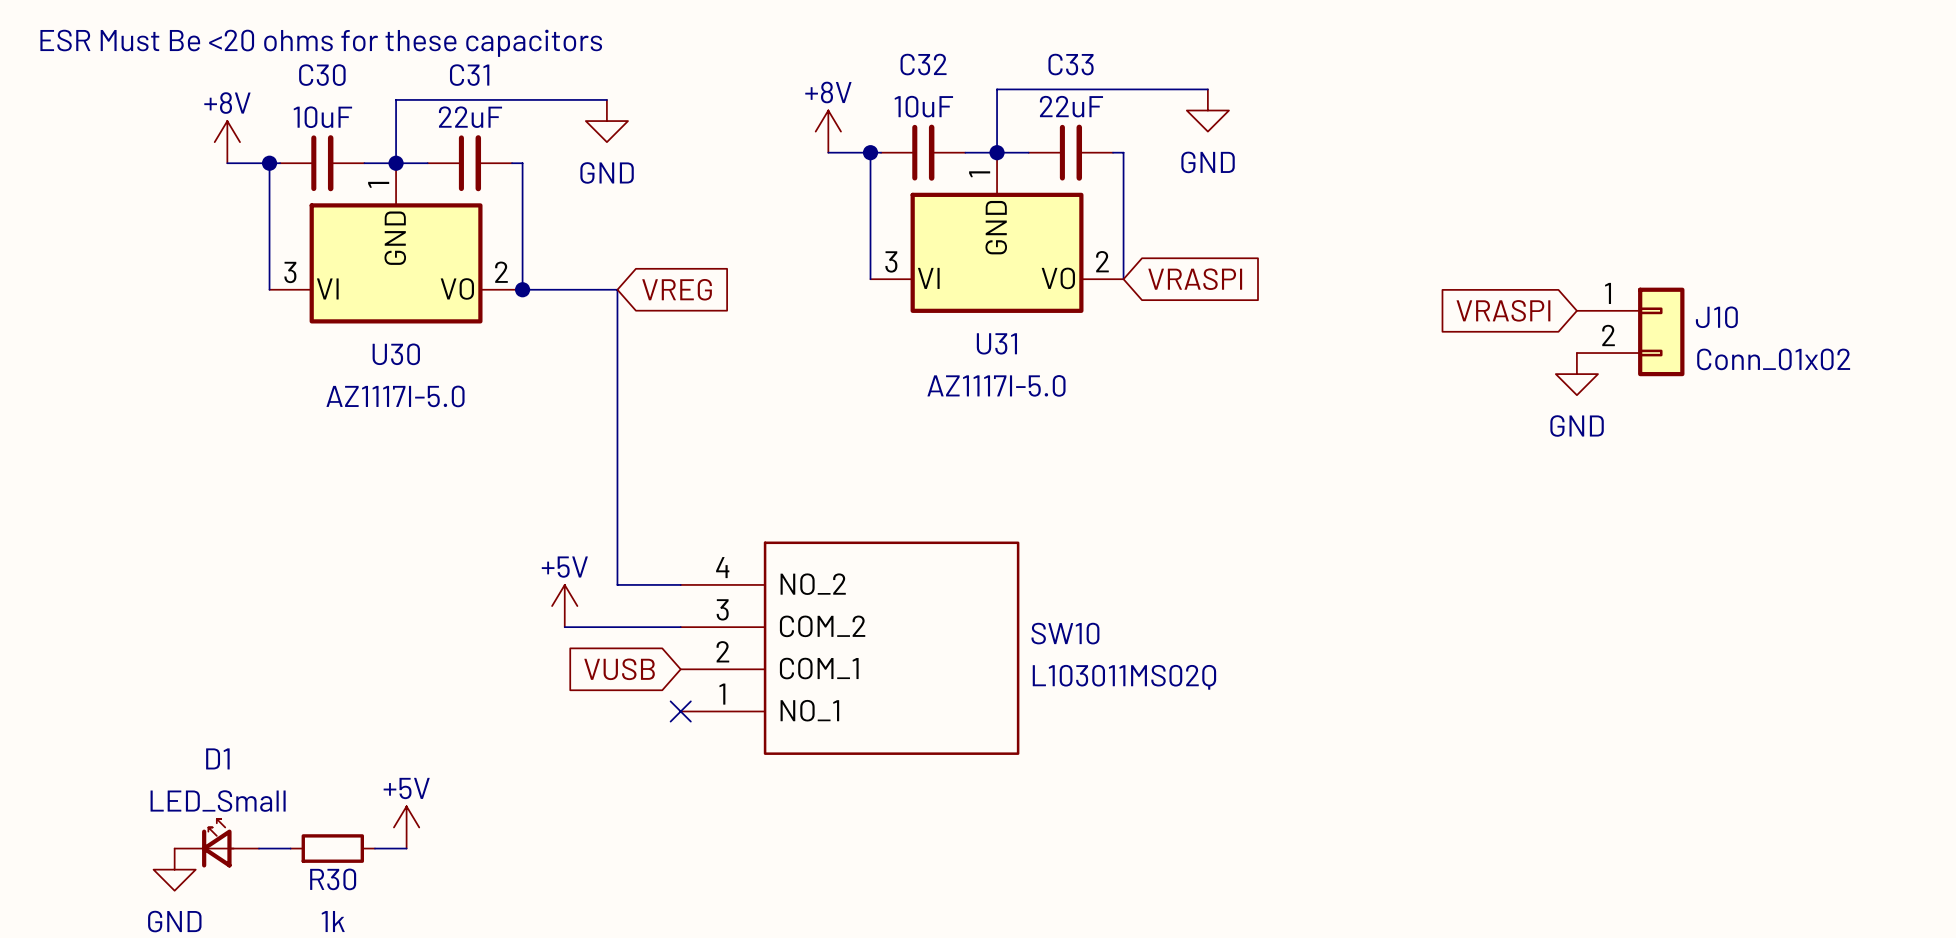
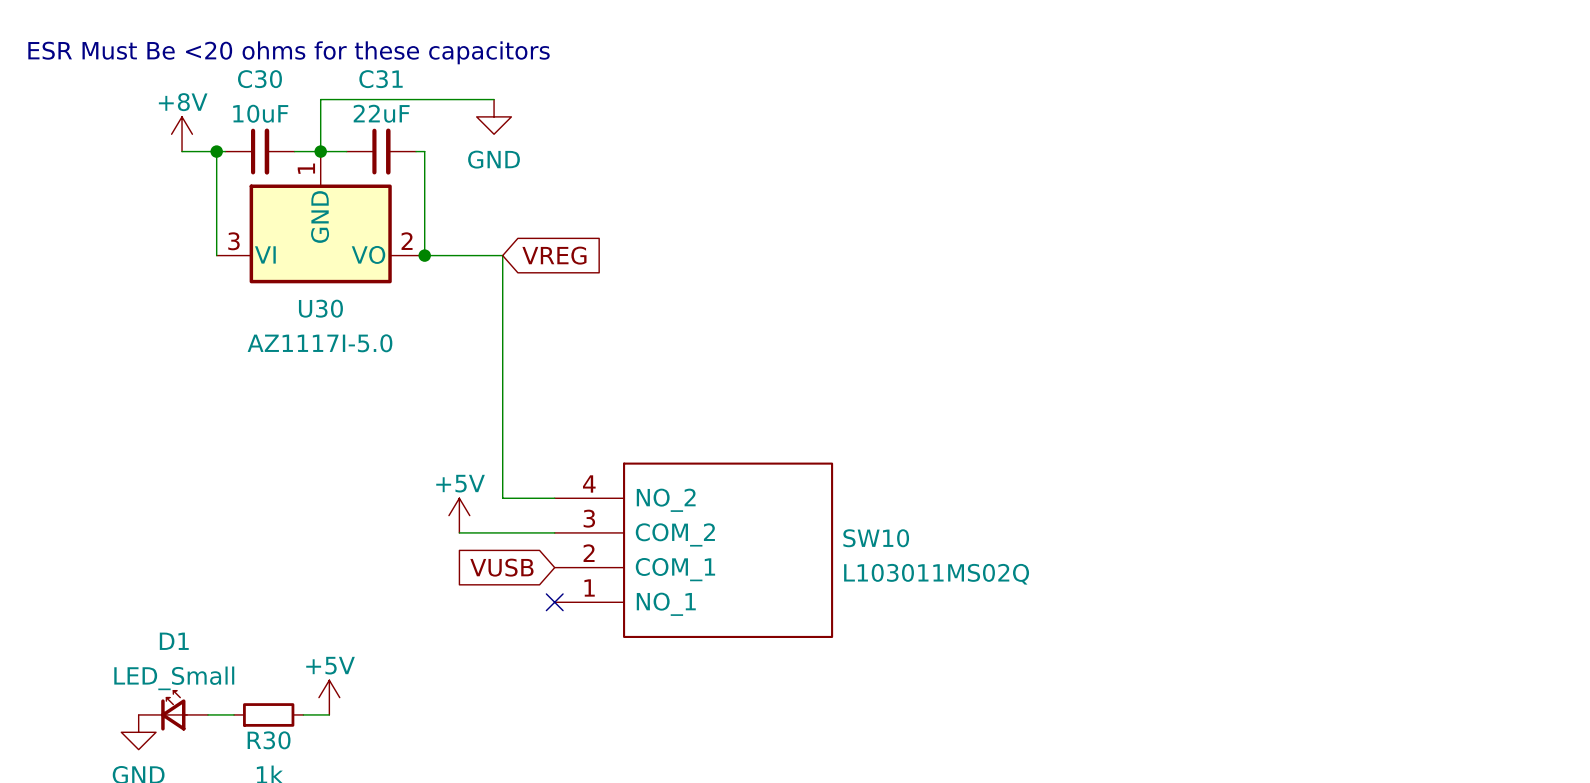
wire: (1207, 89) (997, 89) (997, 152) -> none
power symbol: GND (1207, 110) -> none
power symbol: +8V (828, 131) -> none
wire: (828, 152) (881, 152) -> none
wire: (870, 152) (870, 279) -> none
junction: (870, 152) -> none
C32: 10uF (923, 152) -> none
wire: (965, 152) (1028, 152) -> none
junction: (997, 152) -> none
C33: 22uF (1070, 152) -> none
wire: (1113, 152) (1123, 152) (1123, 279) -> none
U31: AZ1117I-5.0 (997, 232) -> none
global label: VRASPI (1195, 279) -> none
global label: VRASPI (1503, 310) -> none
J10: Conn_01x02 (1630, 331) -> none
power symbol: GND (1576, 374) -> none

